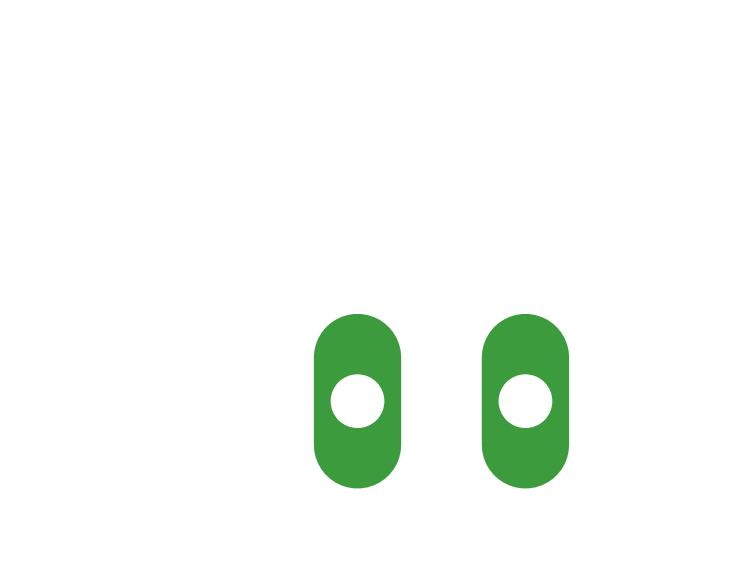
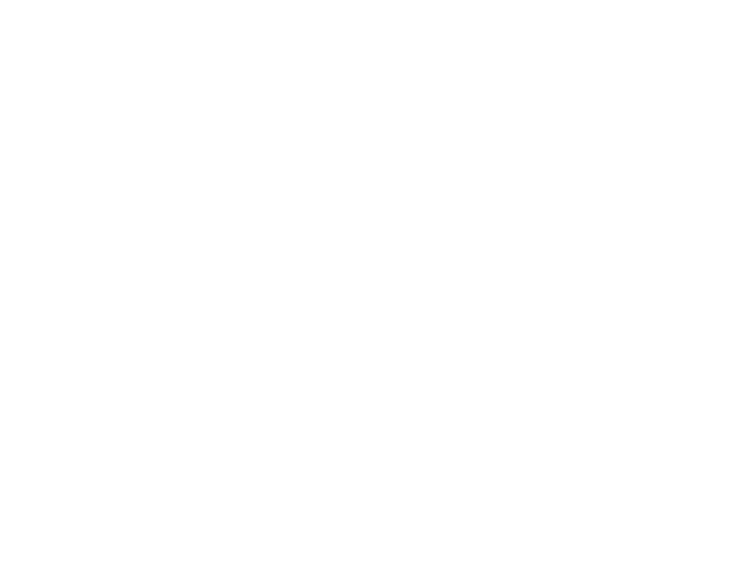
part: (441, 401) -> none

